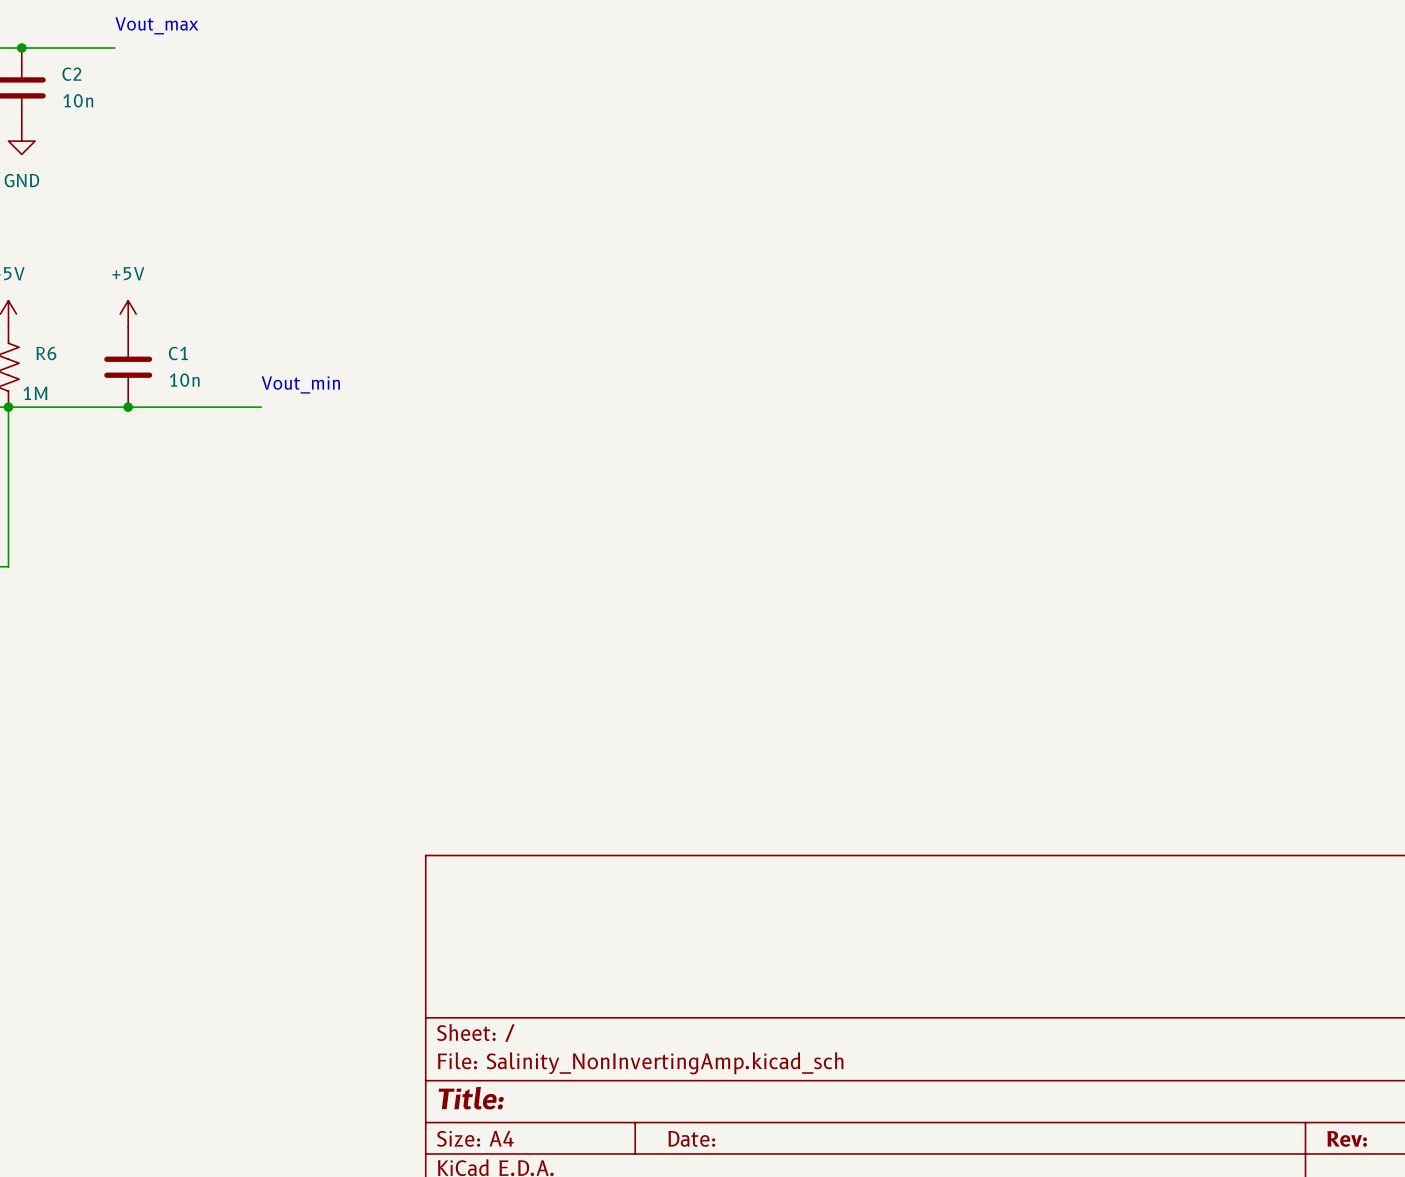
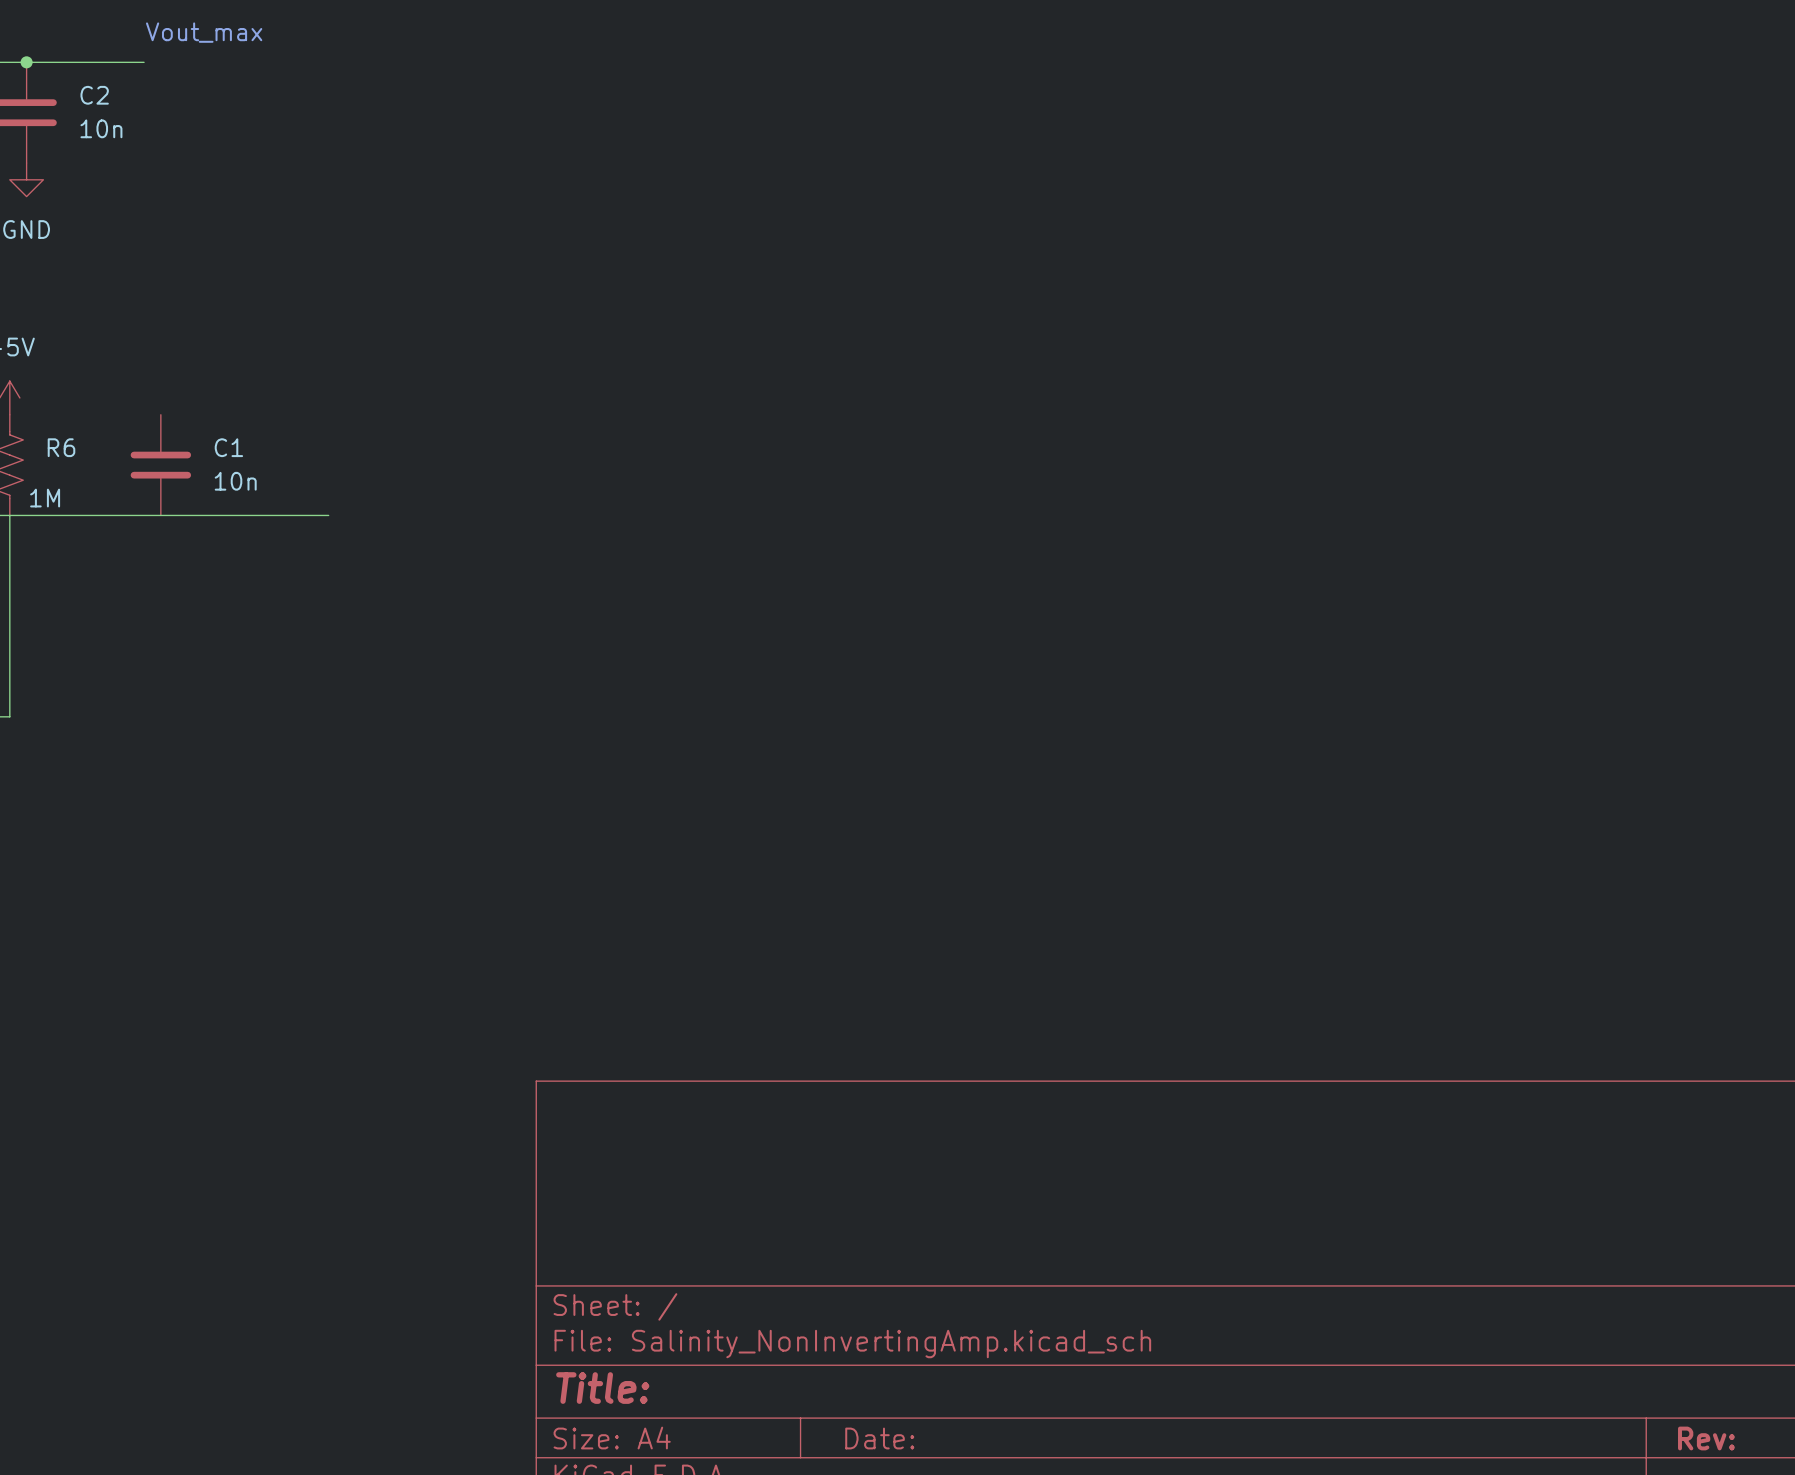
power symbol: +5V (128, 314) -> none
text: Vout_min (300, 384) -> none
junction: (8, 407) -> none
junction: (128, 407) -> none

